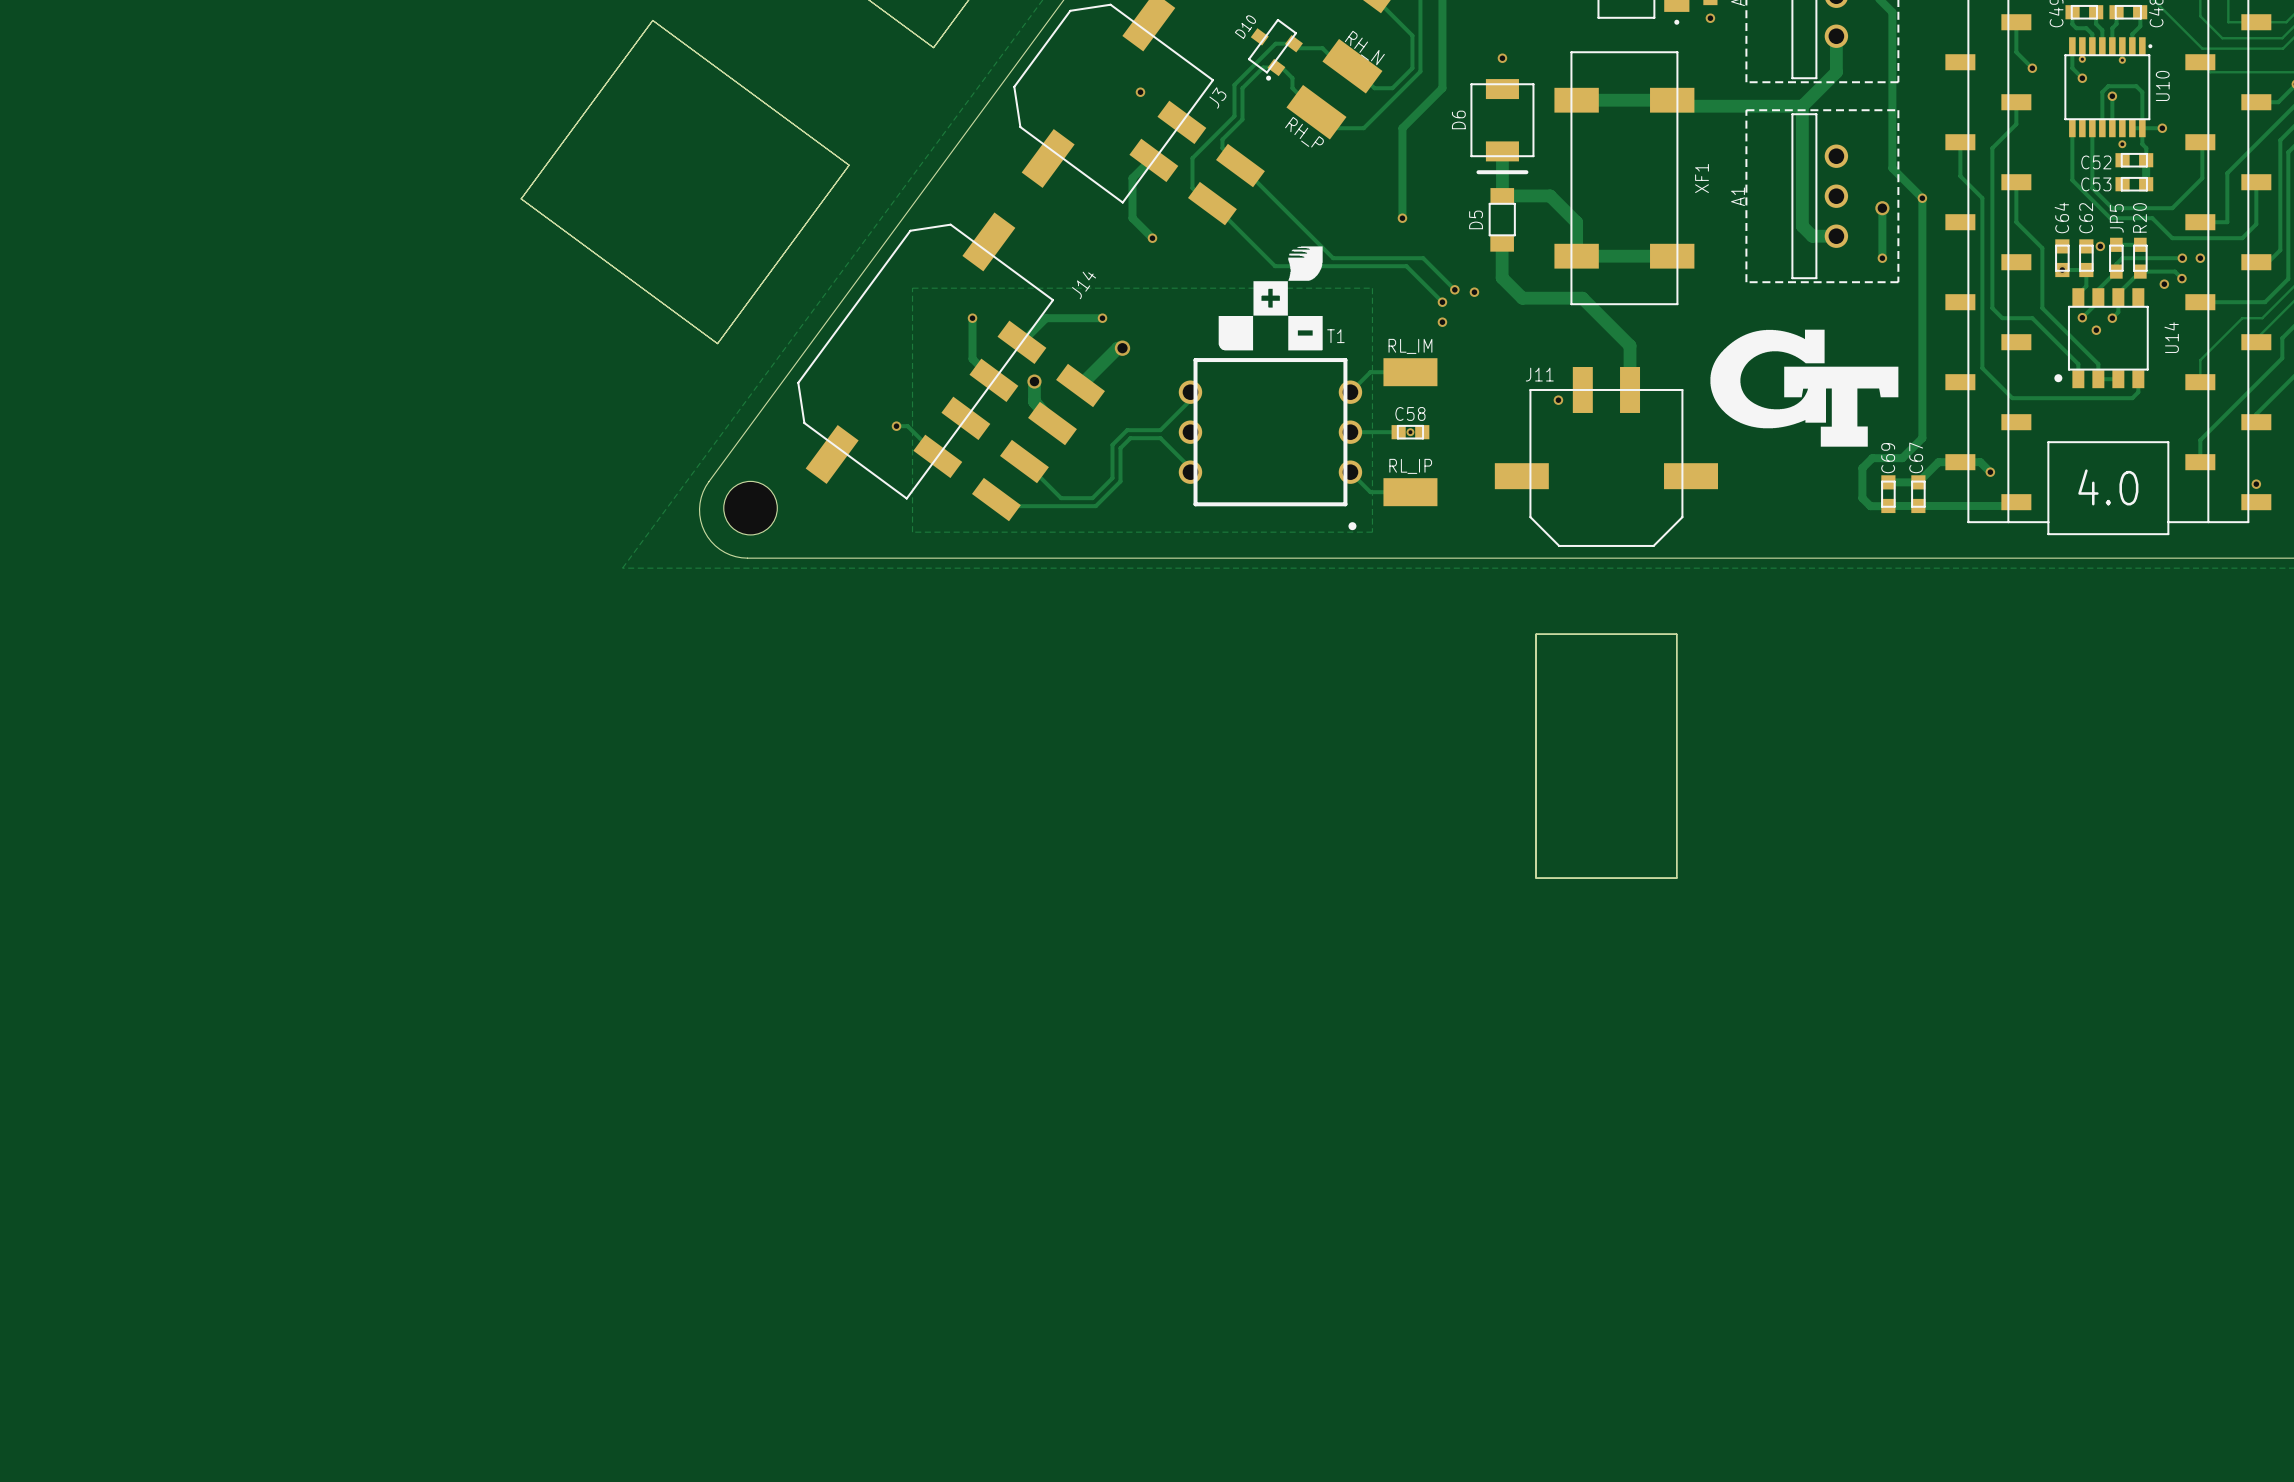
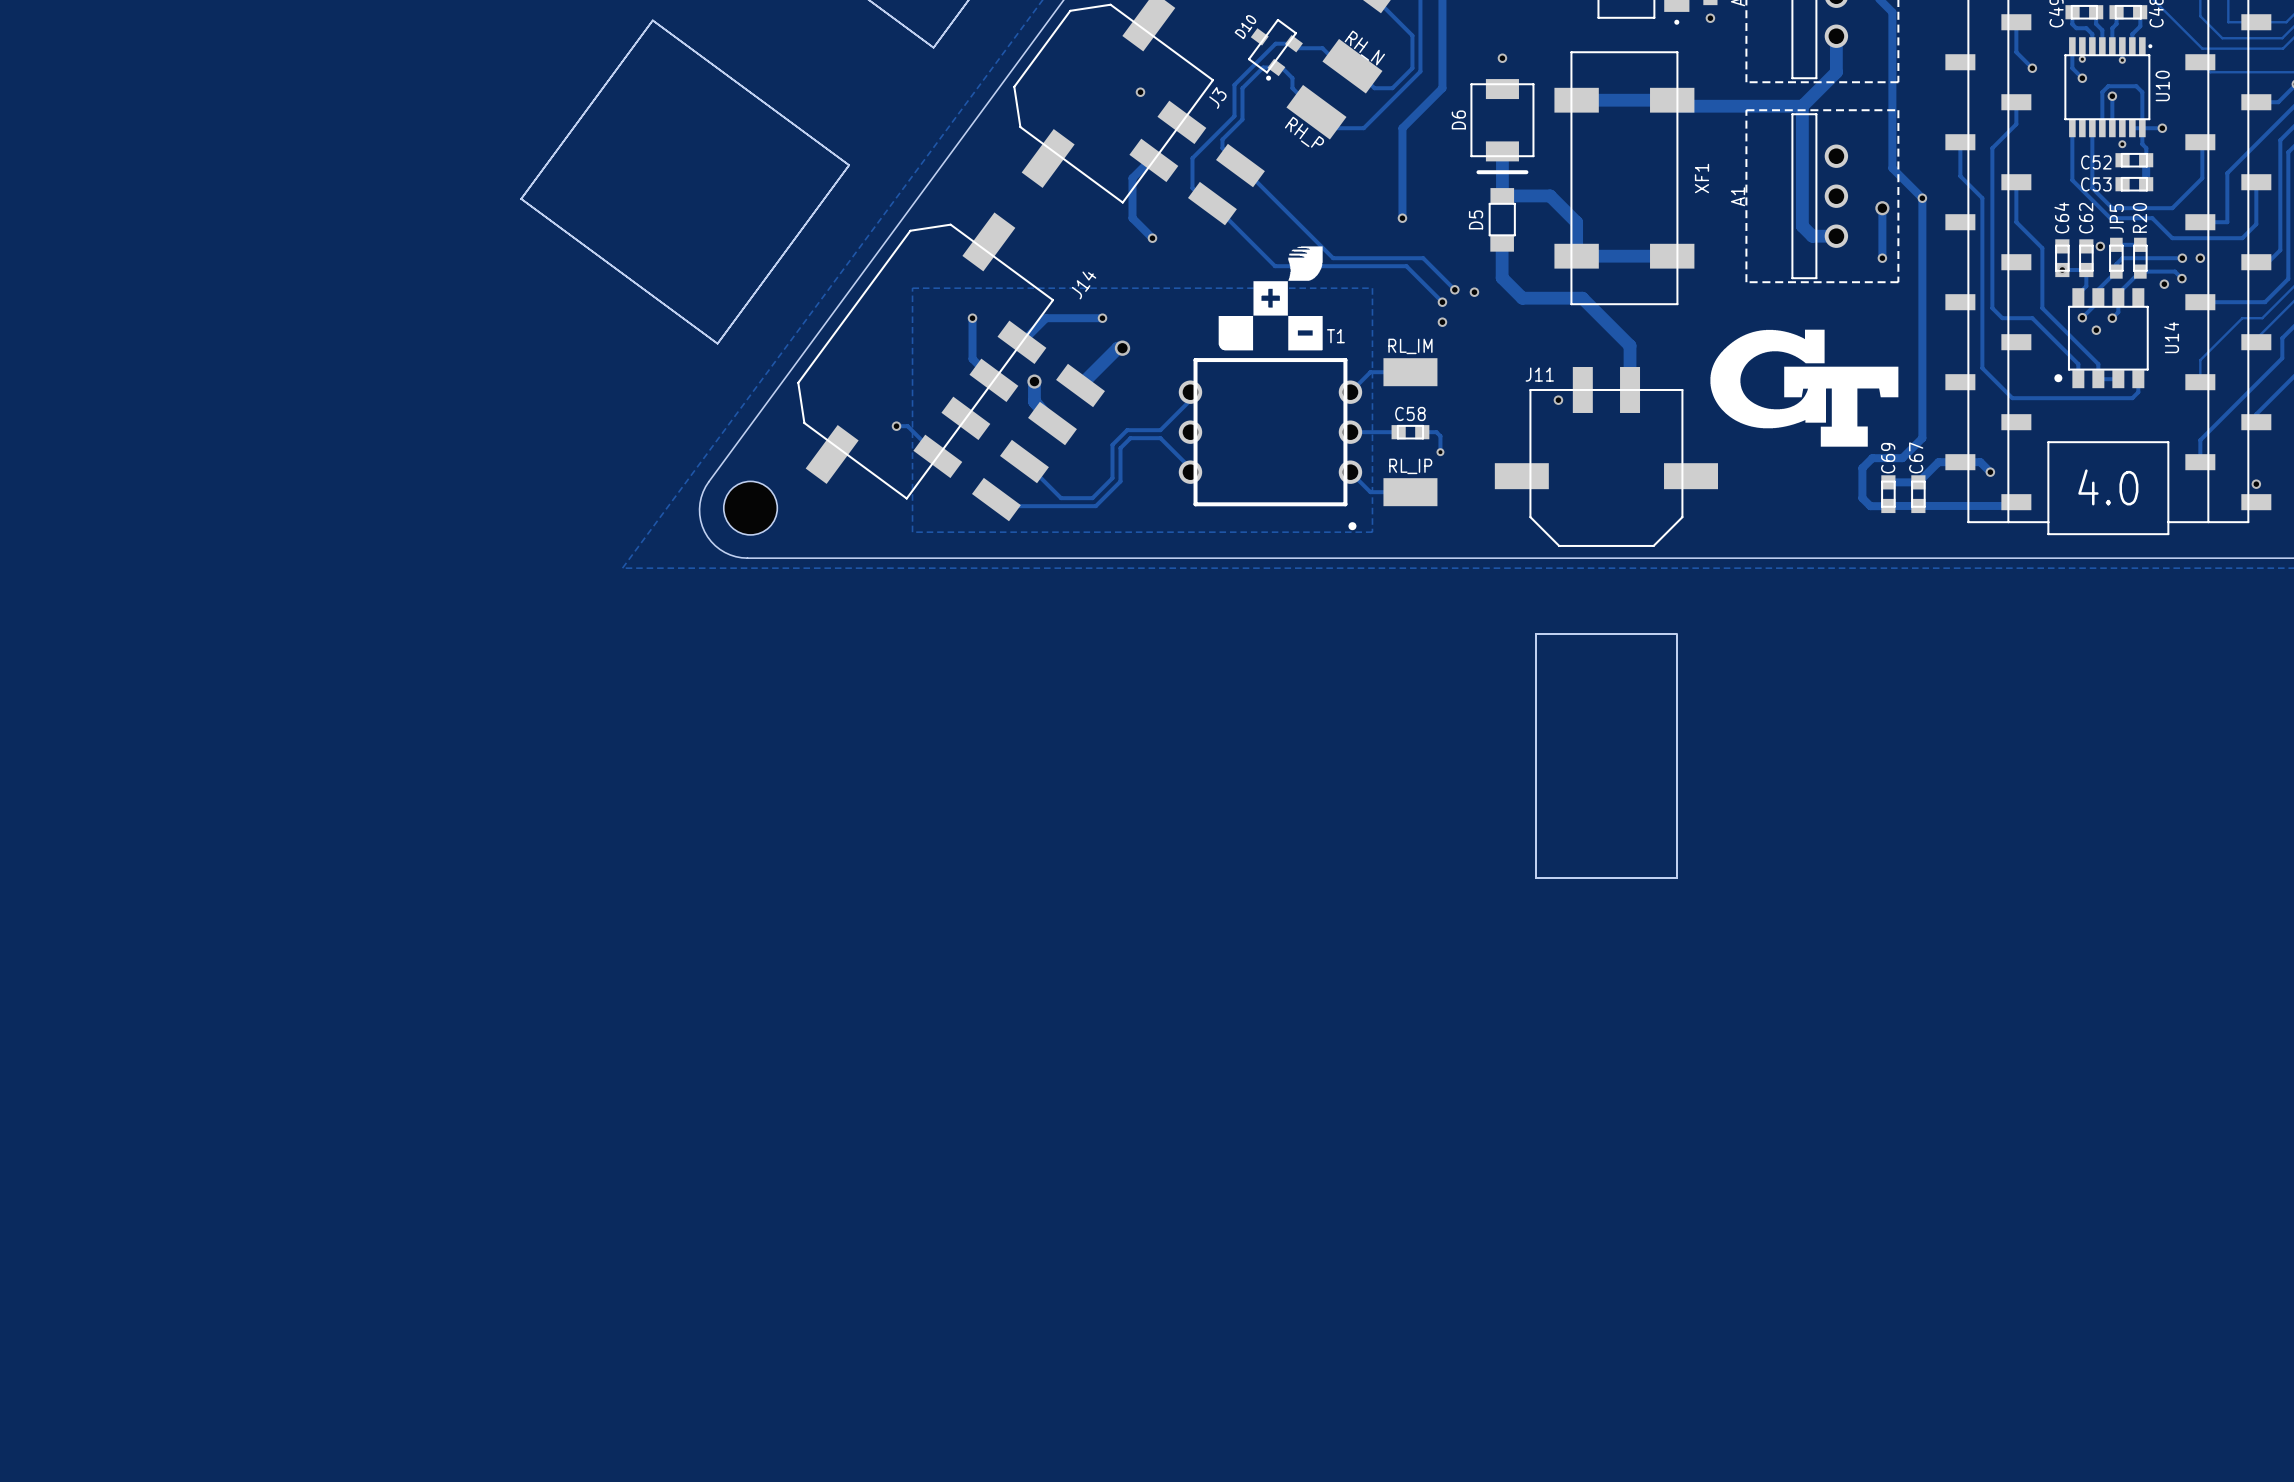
via position: (1410, 432) -> (1440, 452)
track: none -> (1422, 432) (1436, 432) (1440, 436) (1440, 452)

